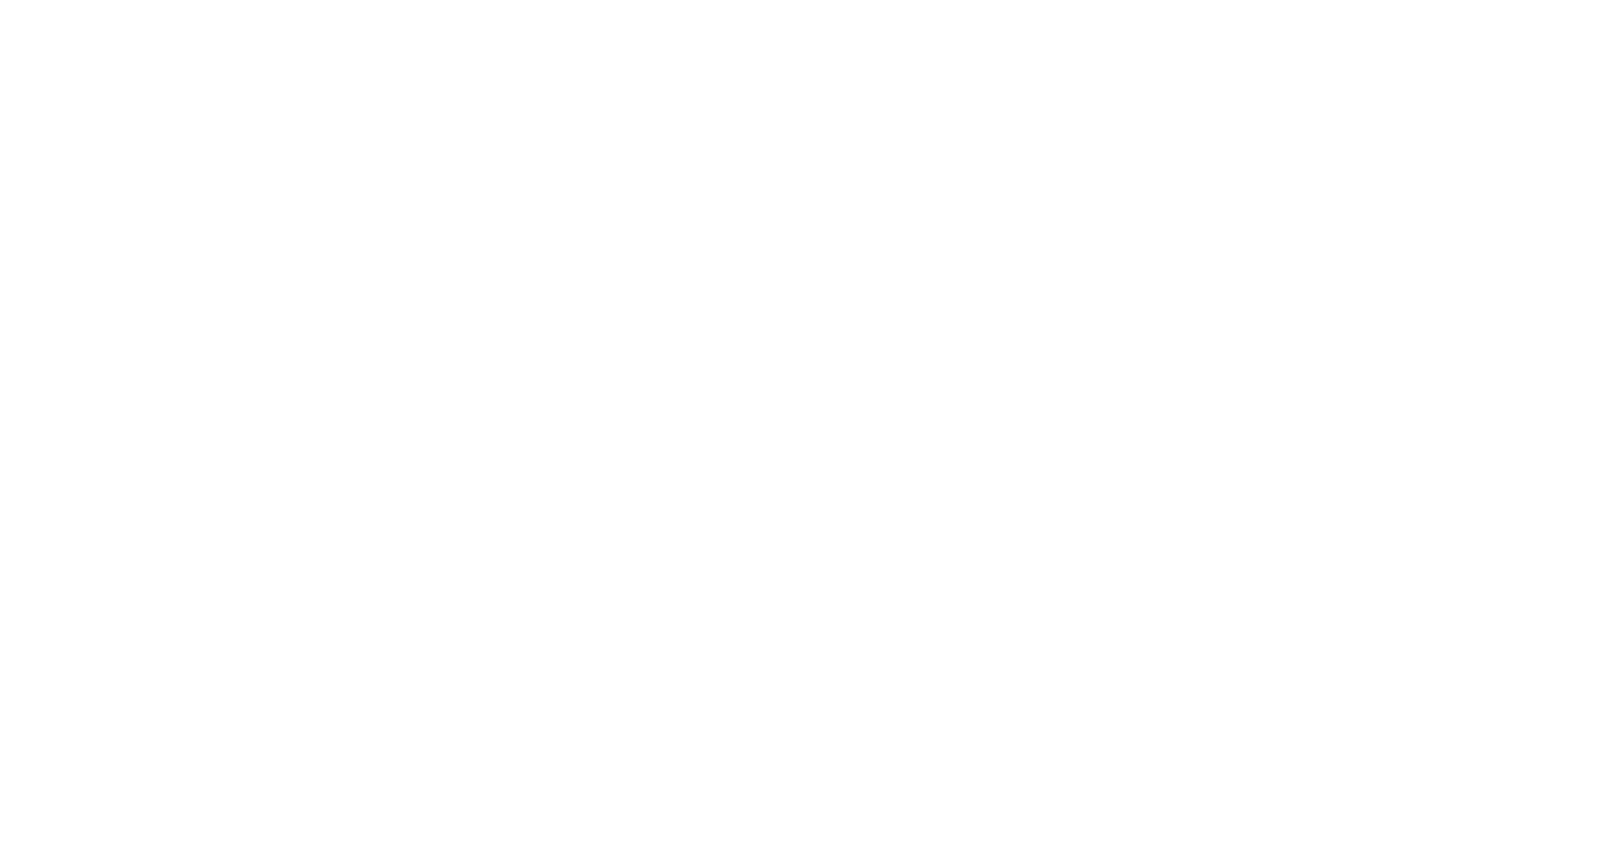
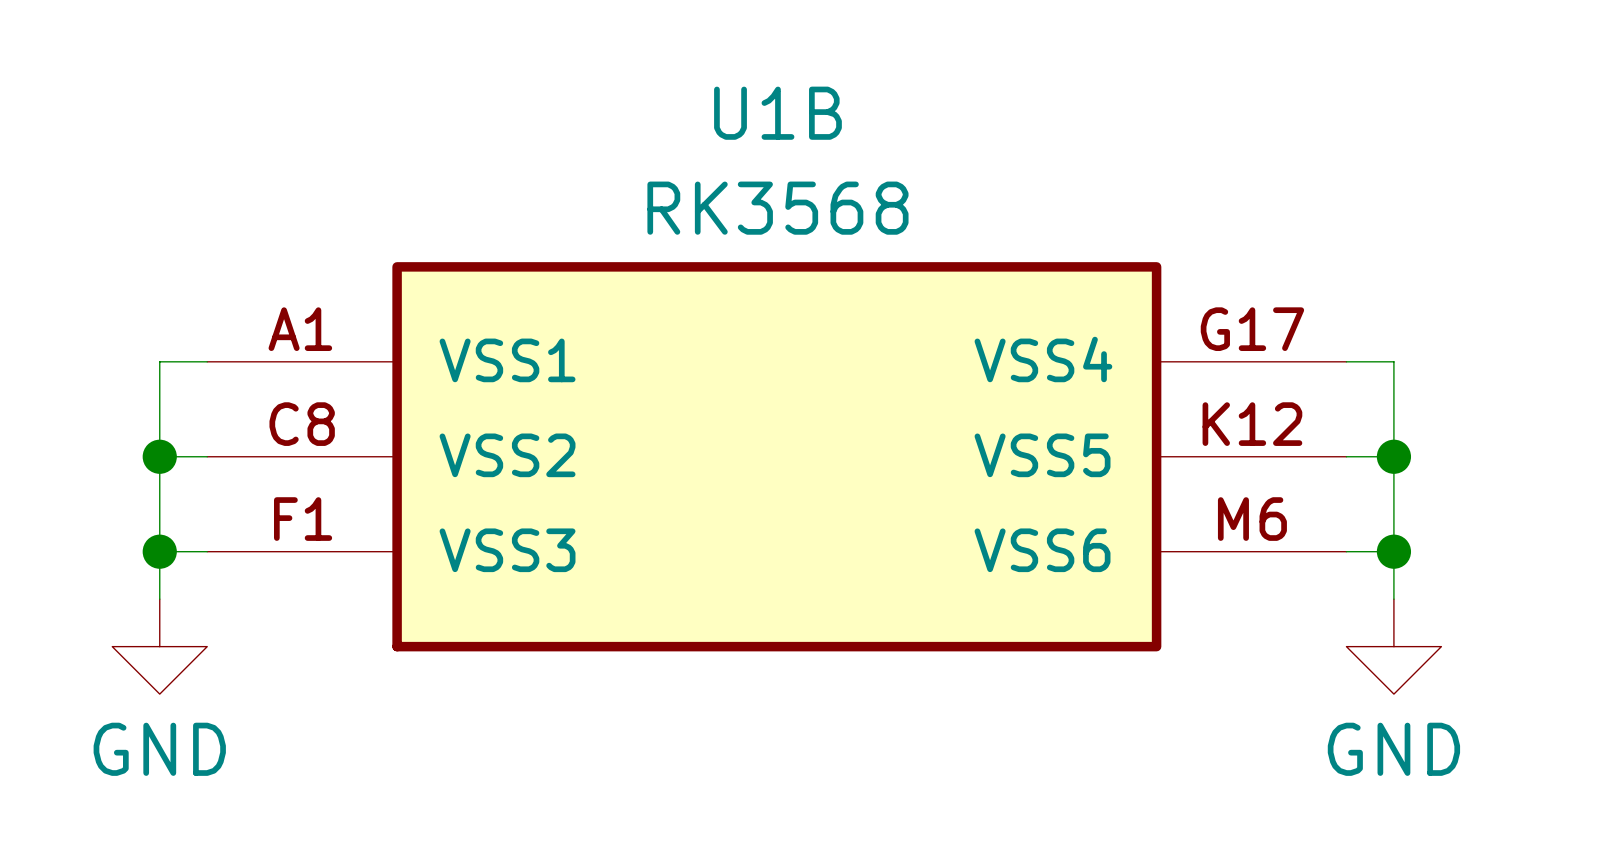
wire: none -> (207, 361) (159, 361) (159, 599)
wire: none -> (1346, 361) (1393, 361) (1393, 599)
wire: none -> (159, 456) (207, 456)
junction: none -> (159, 456)
U1B: none -> RK3568 (776, 456)
wire: none -> (1346, 456) (1393, 456)
junction: none -> (1393, 456)
wire: none -> (159, 551) (207, 551)
junction: none -> (159, 551)
wire: none -> (1346, 551) (1393, 551)
junction: none -> (1393, 551)
power symbol: none -> GND (159, 646)
power symbol: none -> GND (1393, 646)

